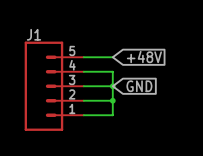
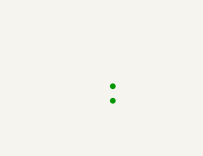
wire: (83, 57) (112, 57) -> none
global label: +48V (144, 57) -> none
wire: (83, 71) (112, 71) (112, 115) (83, 115) -> none
J1: (54, 86) -> none
wire: (83, 86) (112, 86) -> none
global label: GND (139, 86) -> none
wire: (83, 100) (112, 100) -> none

